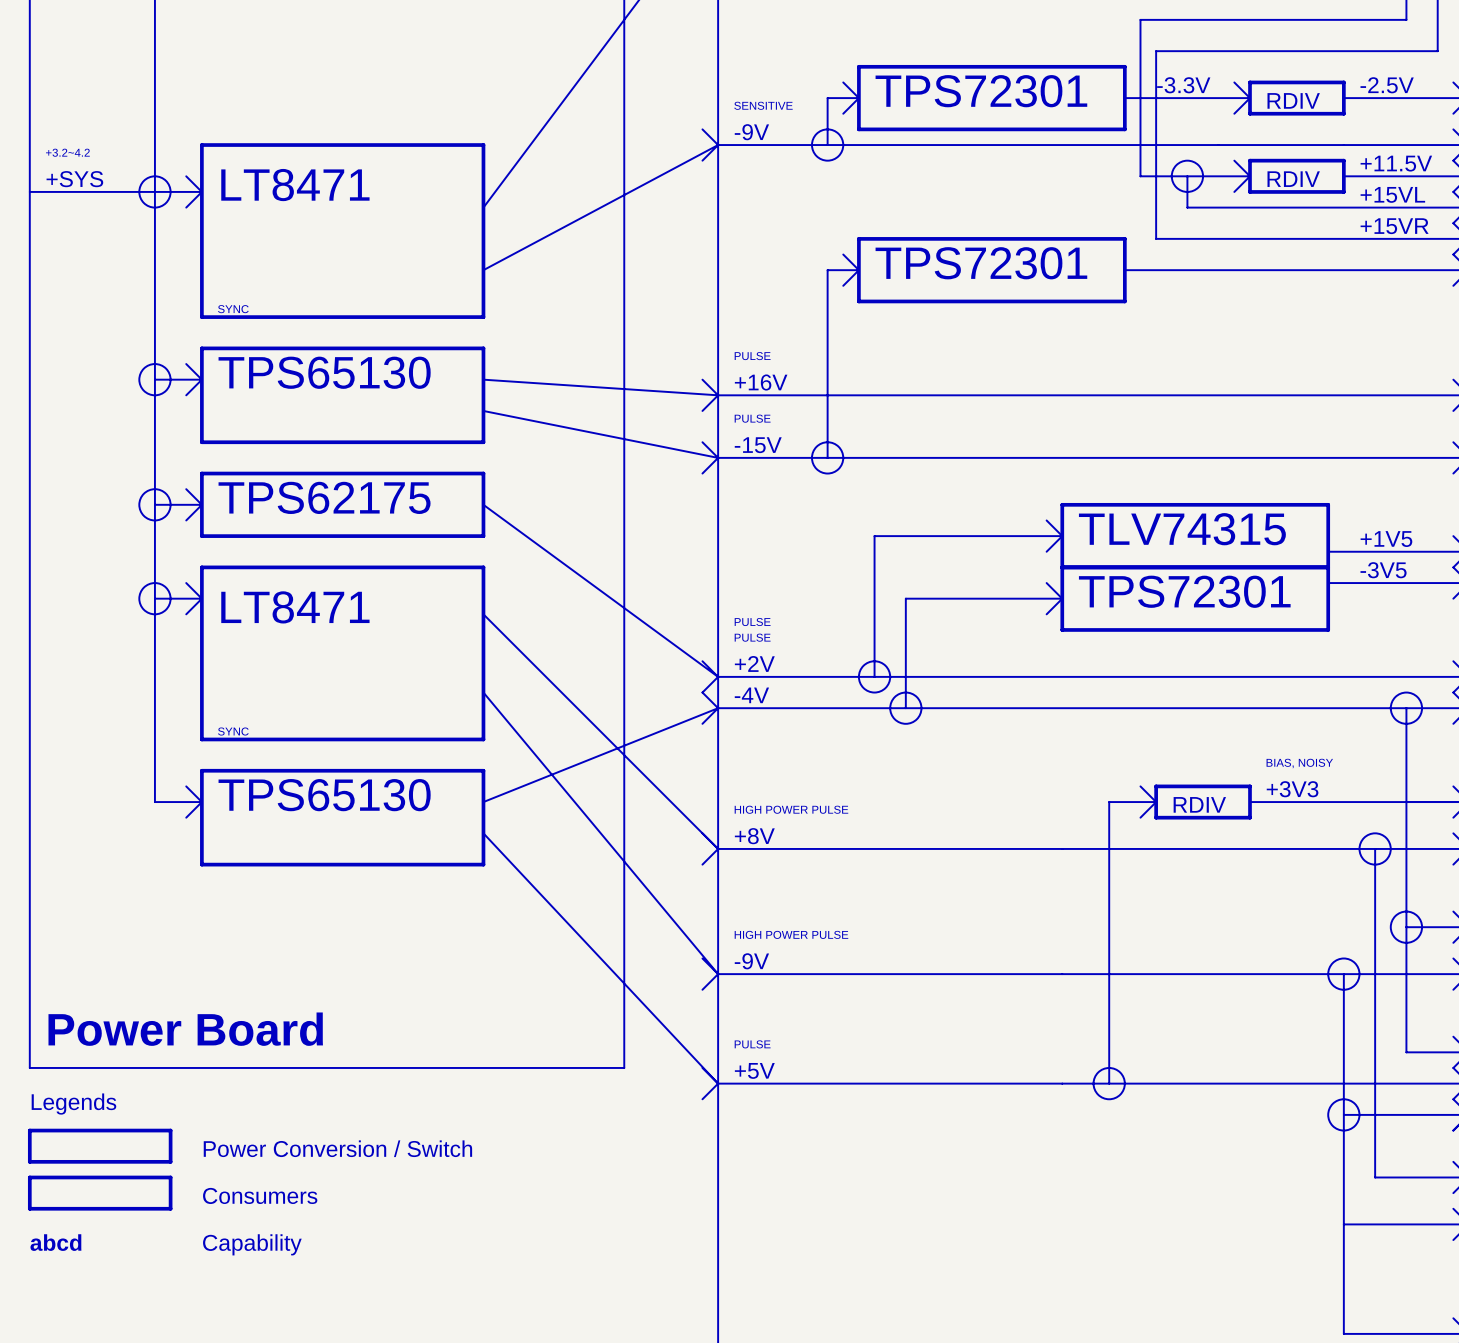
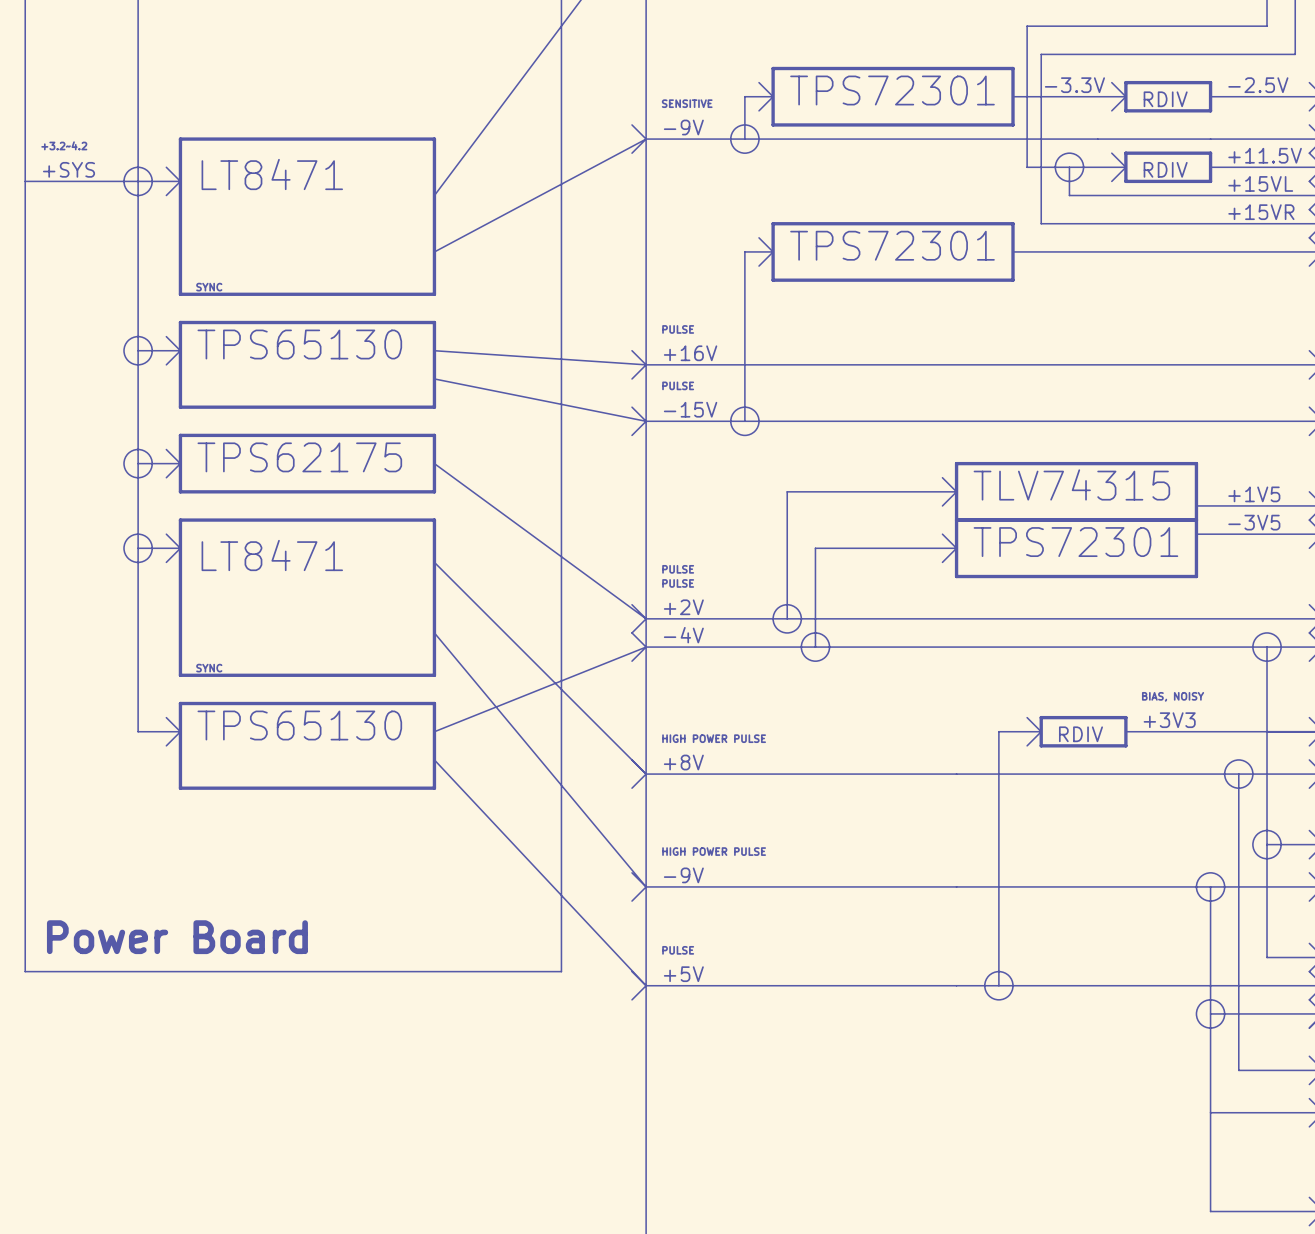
text: Legends (73, 1104) -> none
line: (29, 1130) (170, 1130) (170, 1161) (29, 1161) (29, 1130) -> none
text: Power Conversion / Switch (337, 1148) -> none
line: (29, 1177) (29, 1208) (170, 1208) (170, 1177) (29, 1177) -> none
text: Consumers (260, 1195) -> none
text: abcd (55, 1242) -> none
text: Capability (252, 1244) -> none

